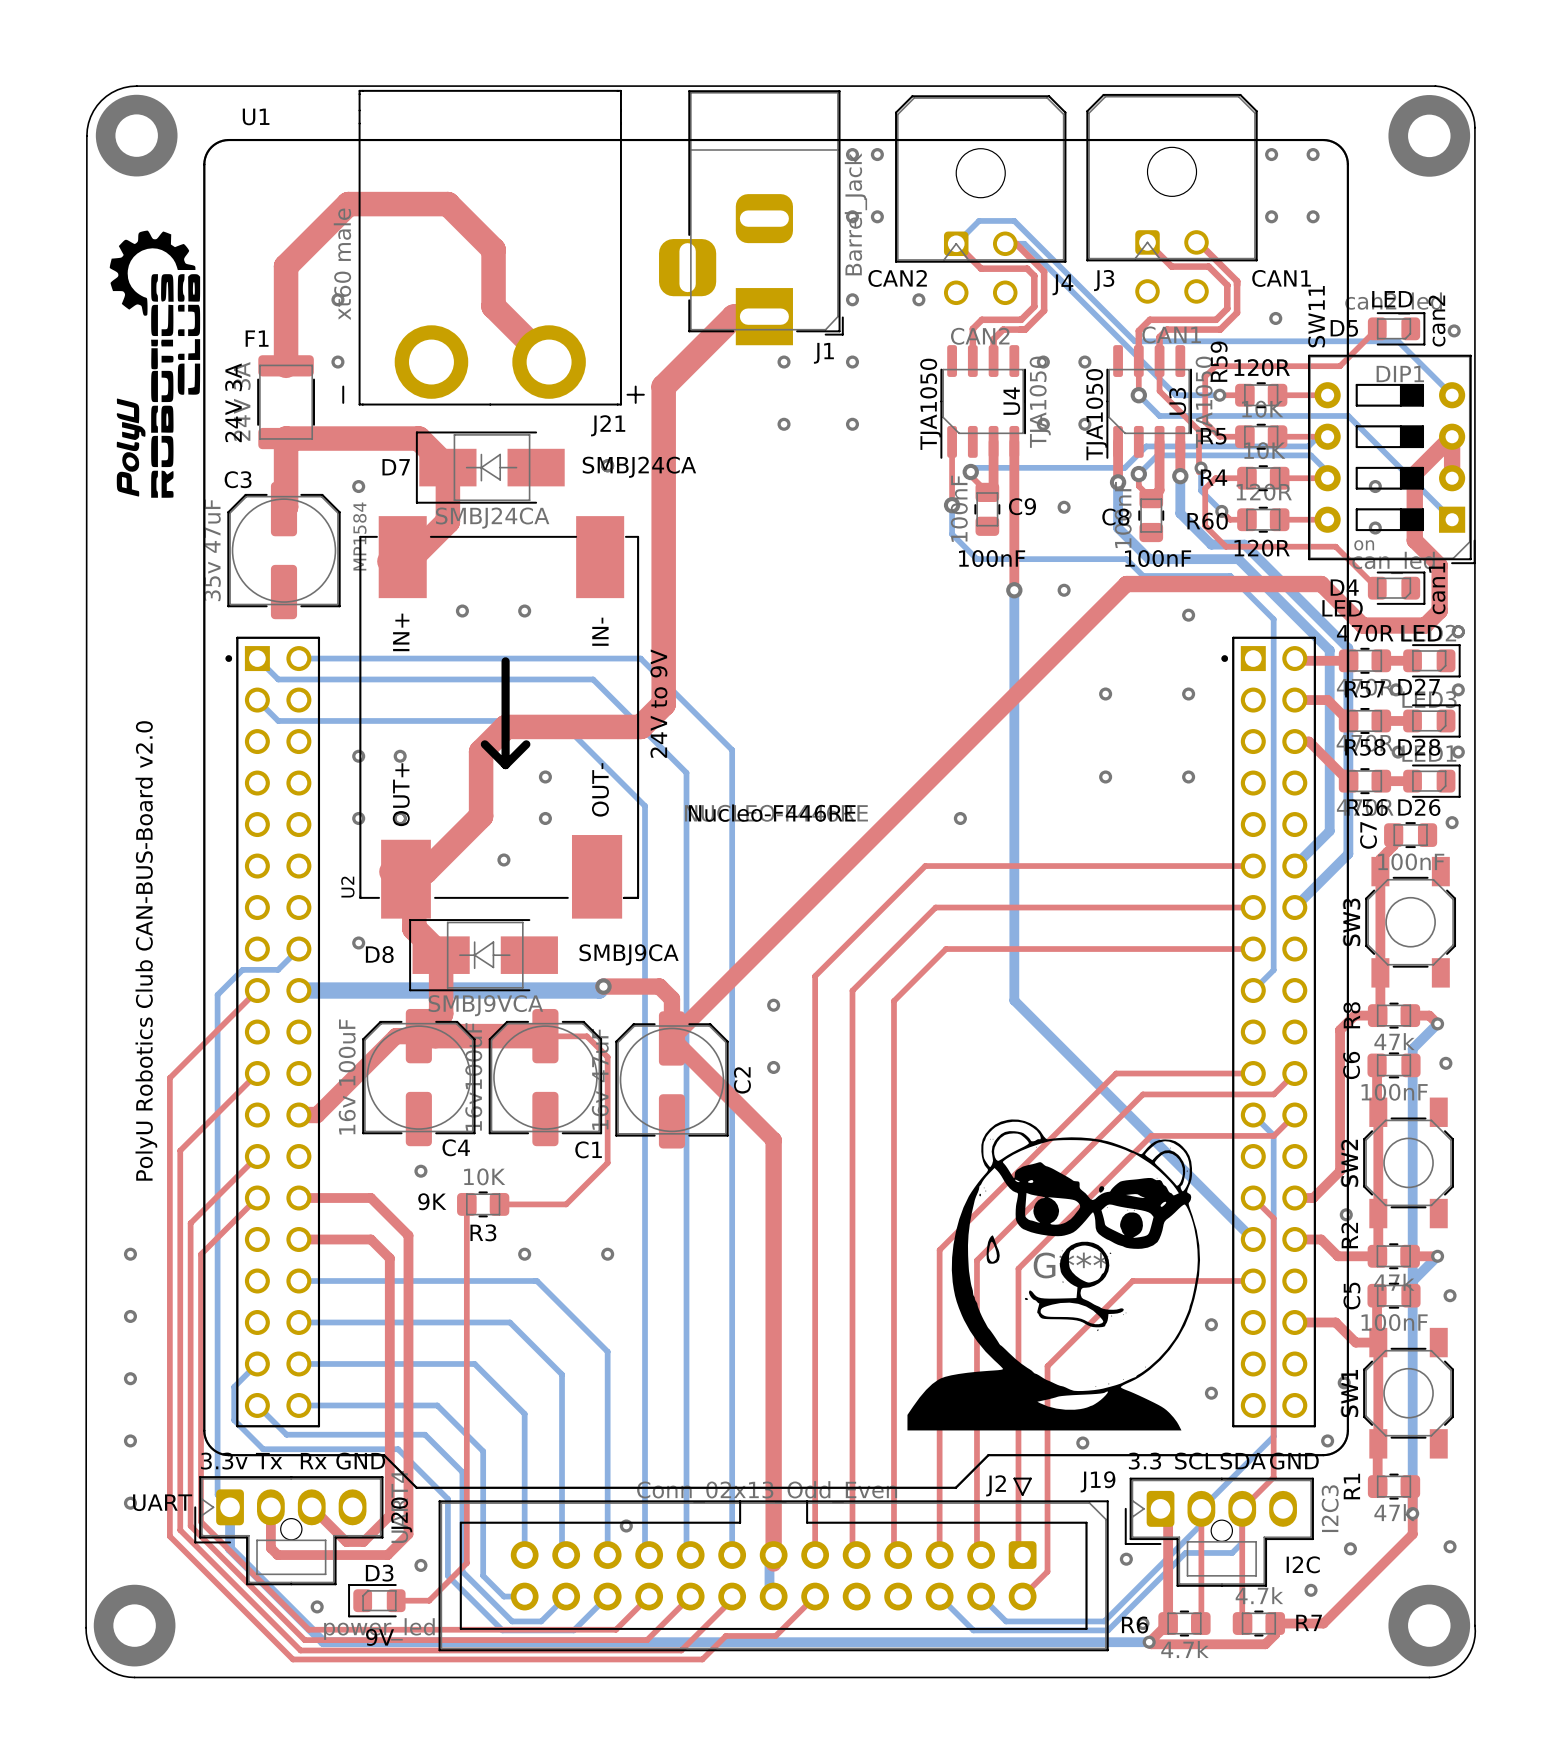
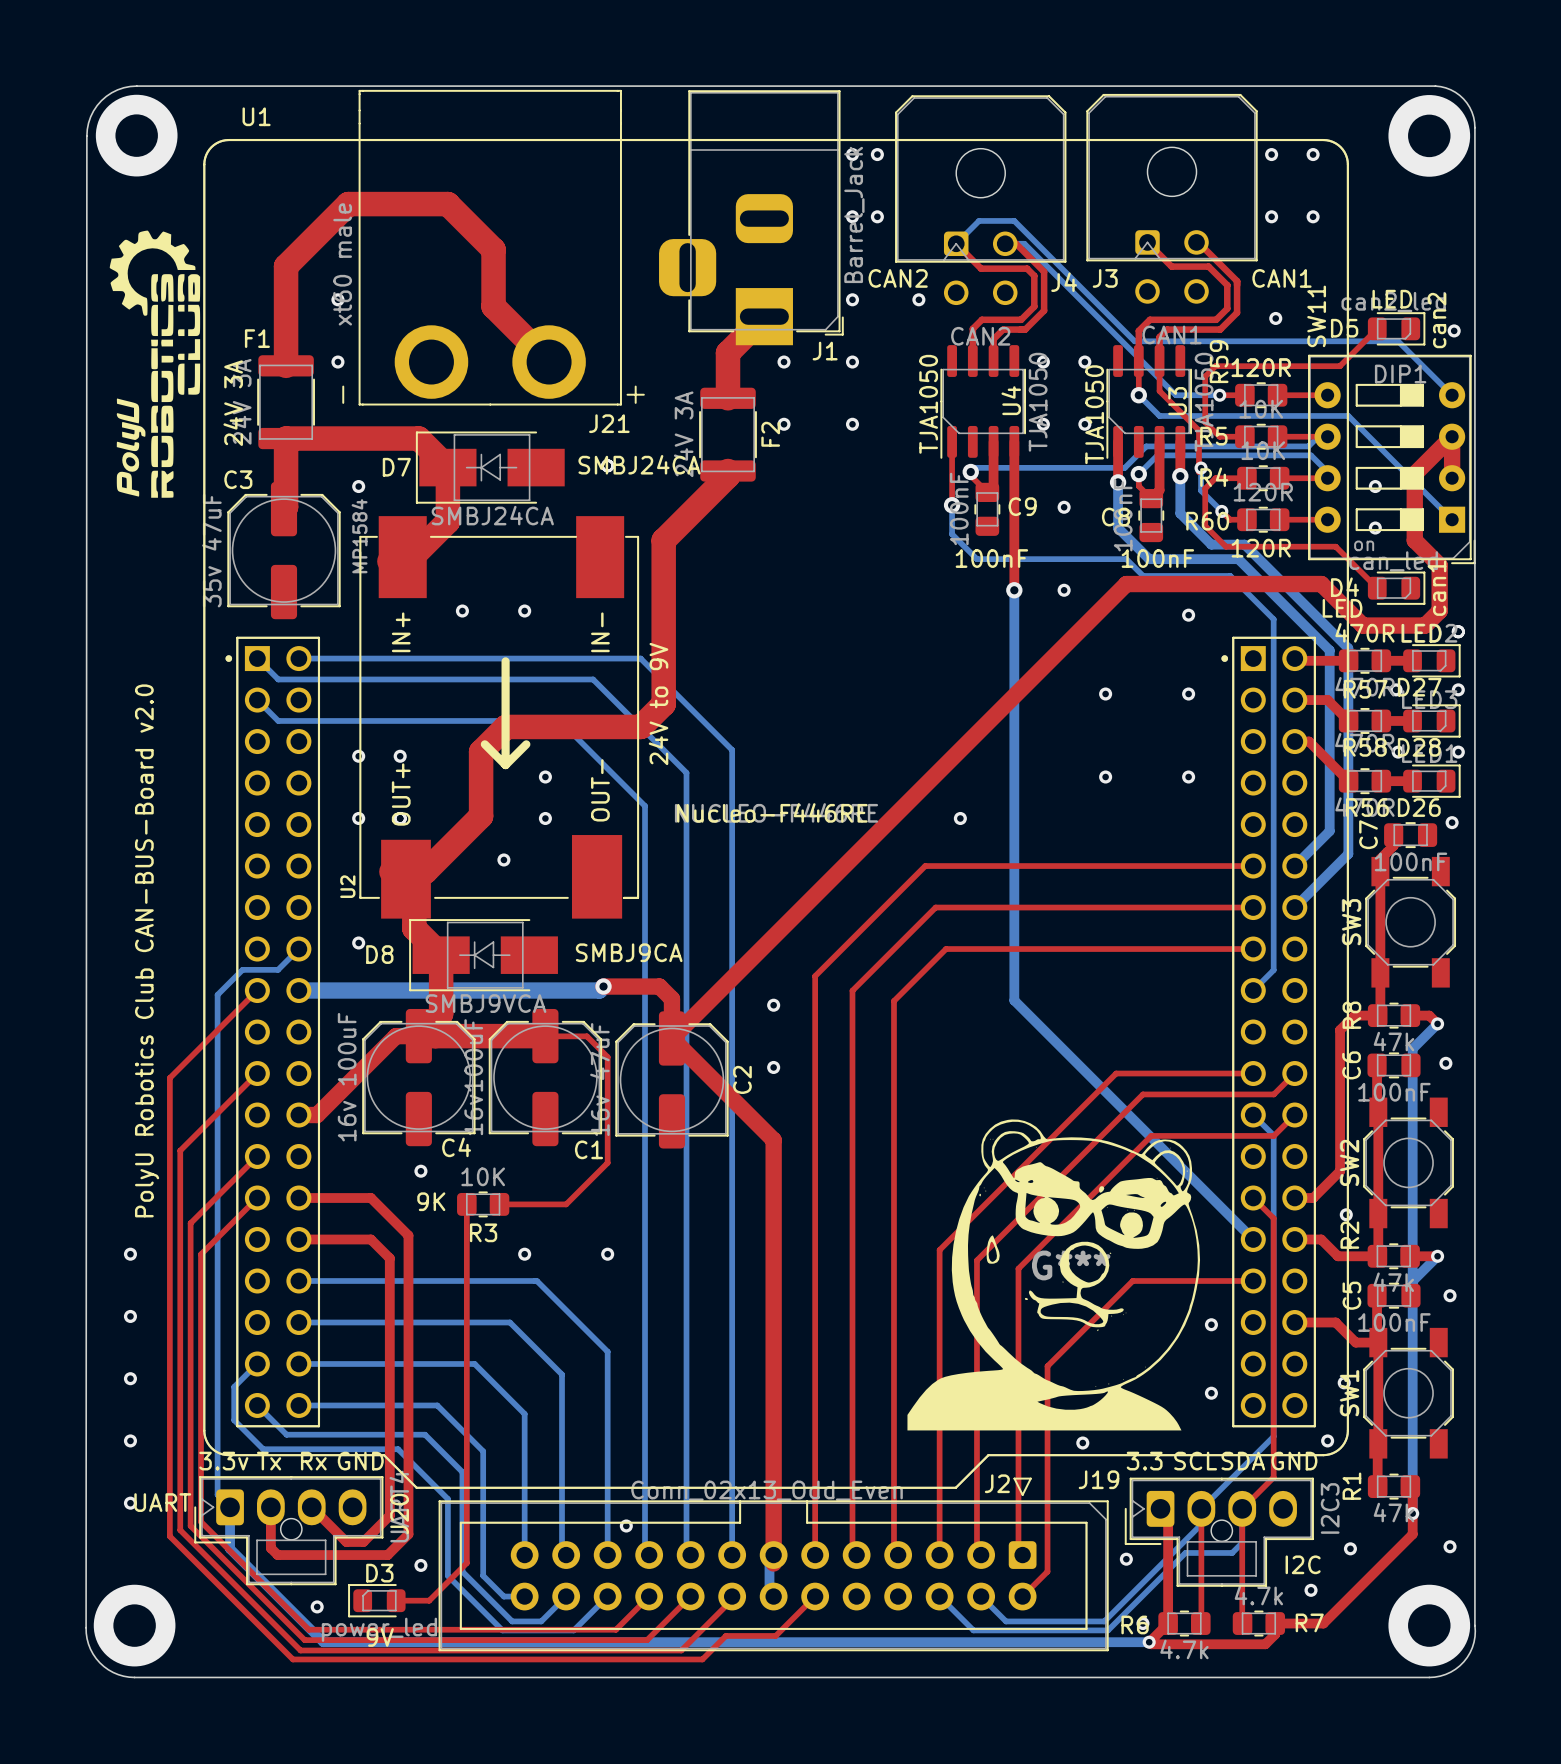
top track: (764, 316) (733, 316) (663, 386) (663, 540) -> (764, 316) (728, 353) (728, 398)
F2: none -> 24V 3A (728, 434)
top track: none -> (728, 471) (728, 476) (663, 540)

